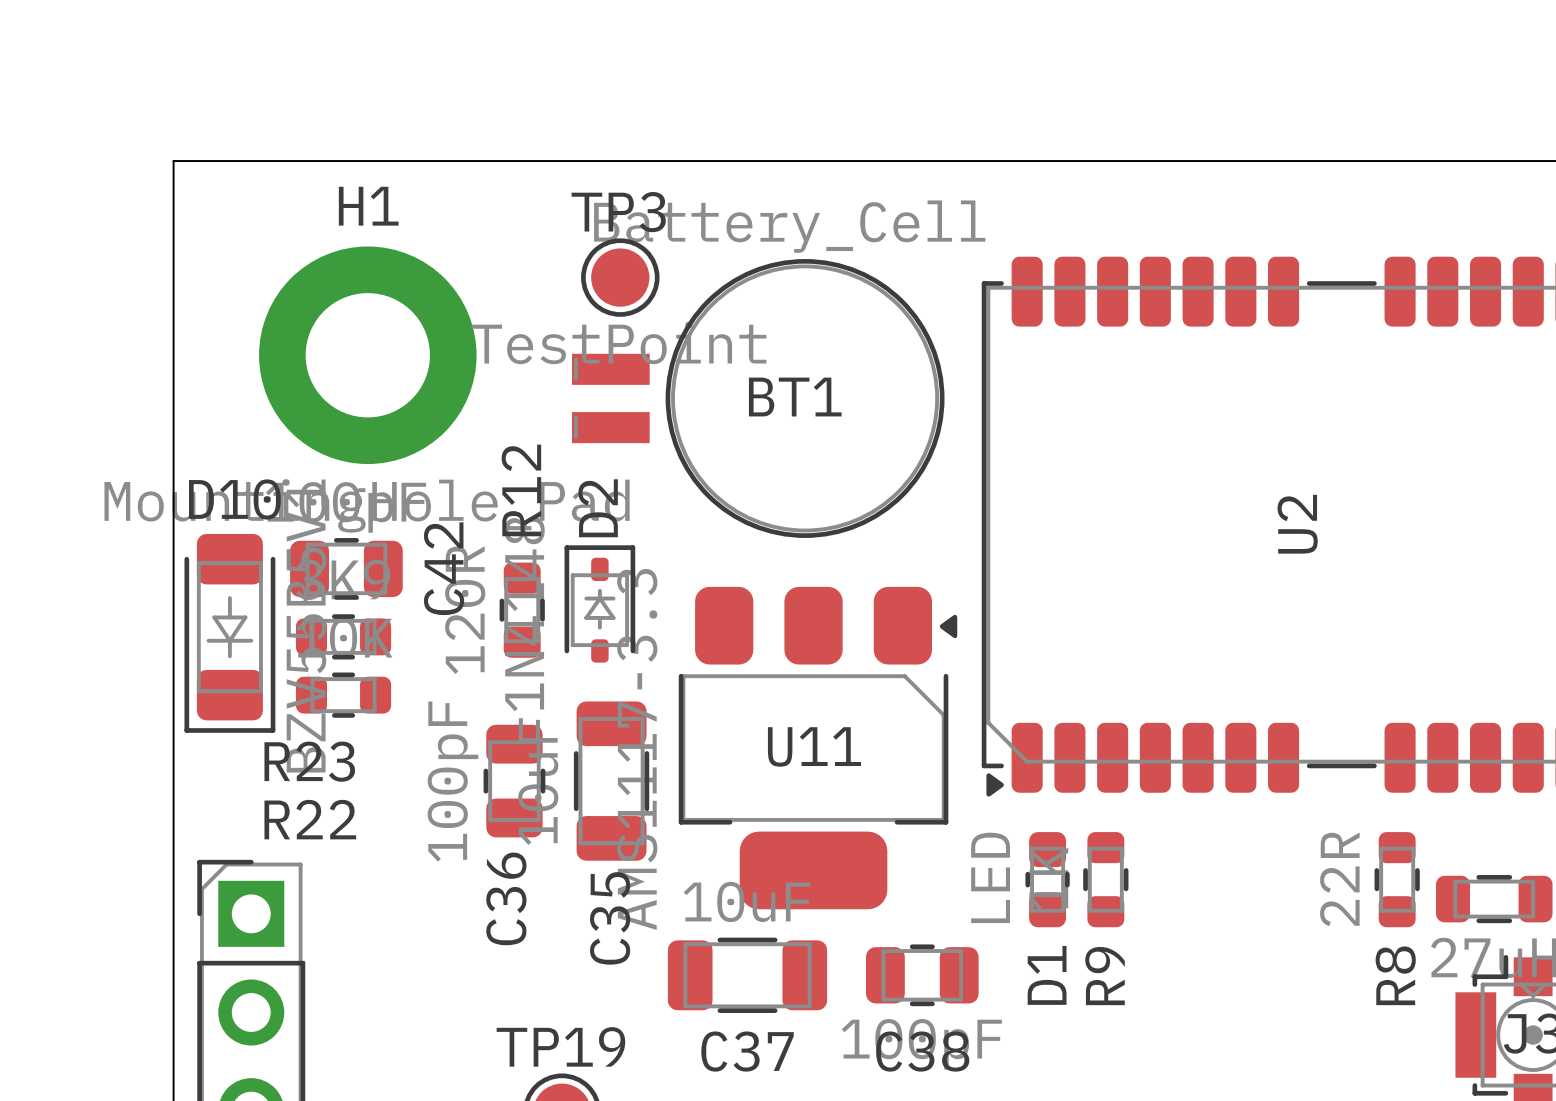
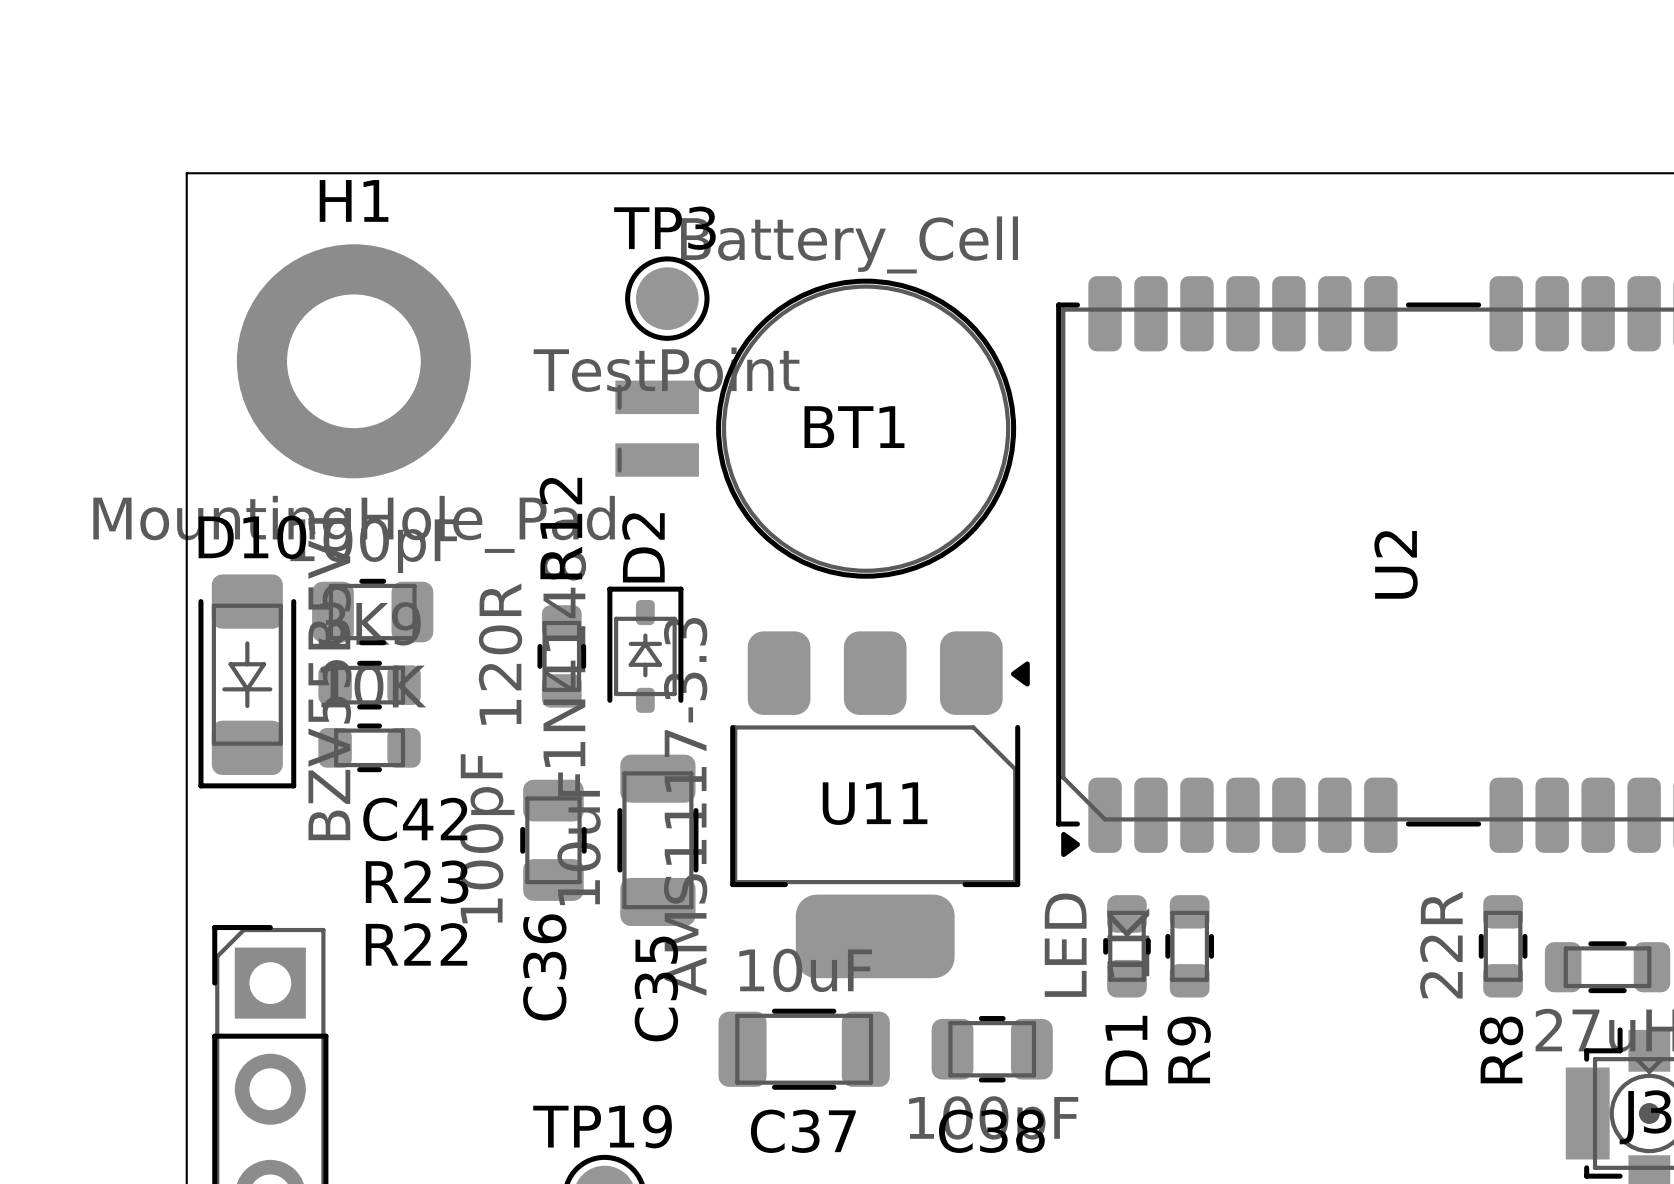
H1 position: (367, 355) -> (353, 361)
C42 name rotation: 0° (444, 568) -> 90° clockwise (415, 819)
C42 name position: C42 (444, 568) -> C42 (415, 819)
R23 name position: R23 (309, 761) -> R23 (417, 882)
R22 name position: R22 (310, 819) -> R22 (416, 944)

